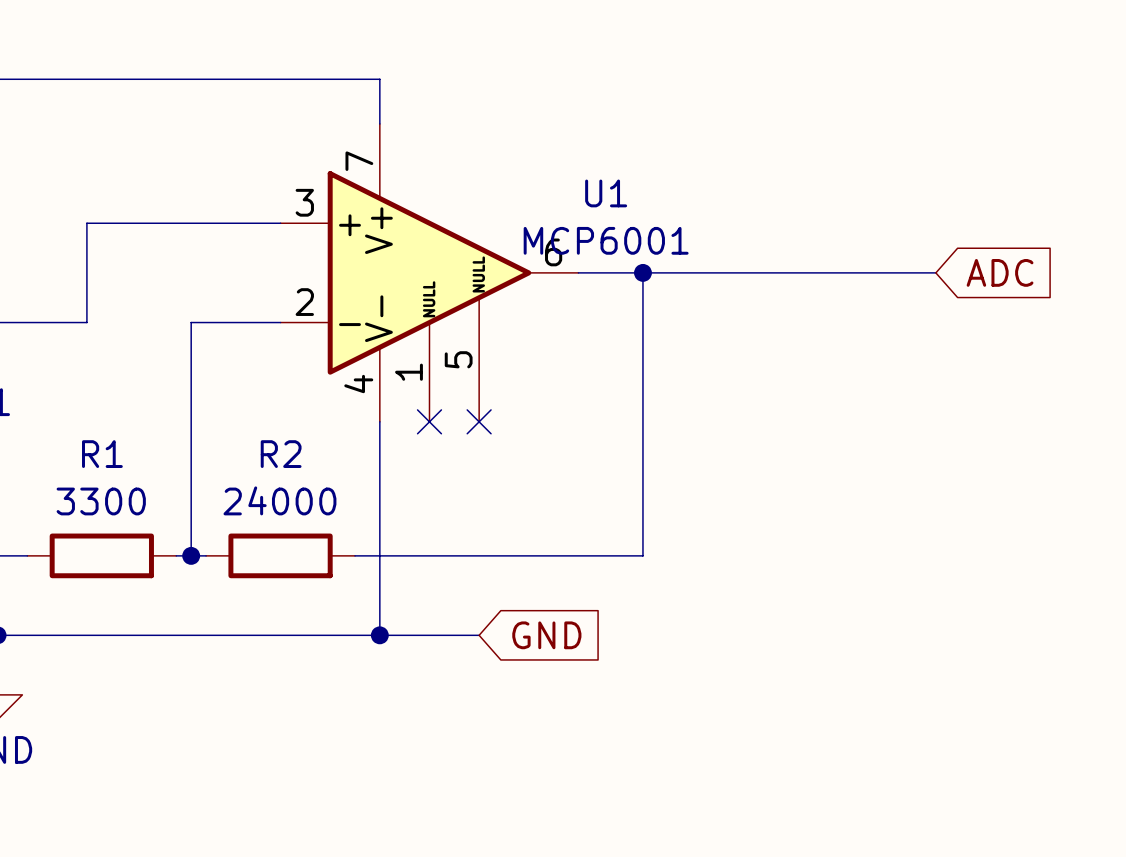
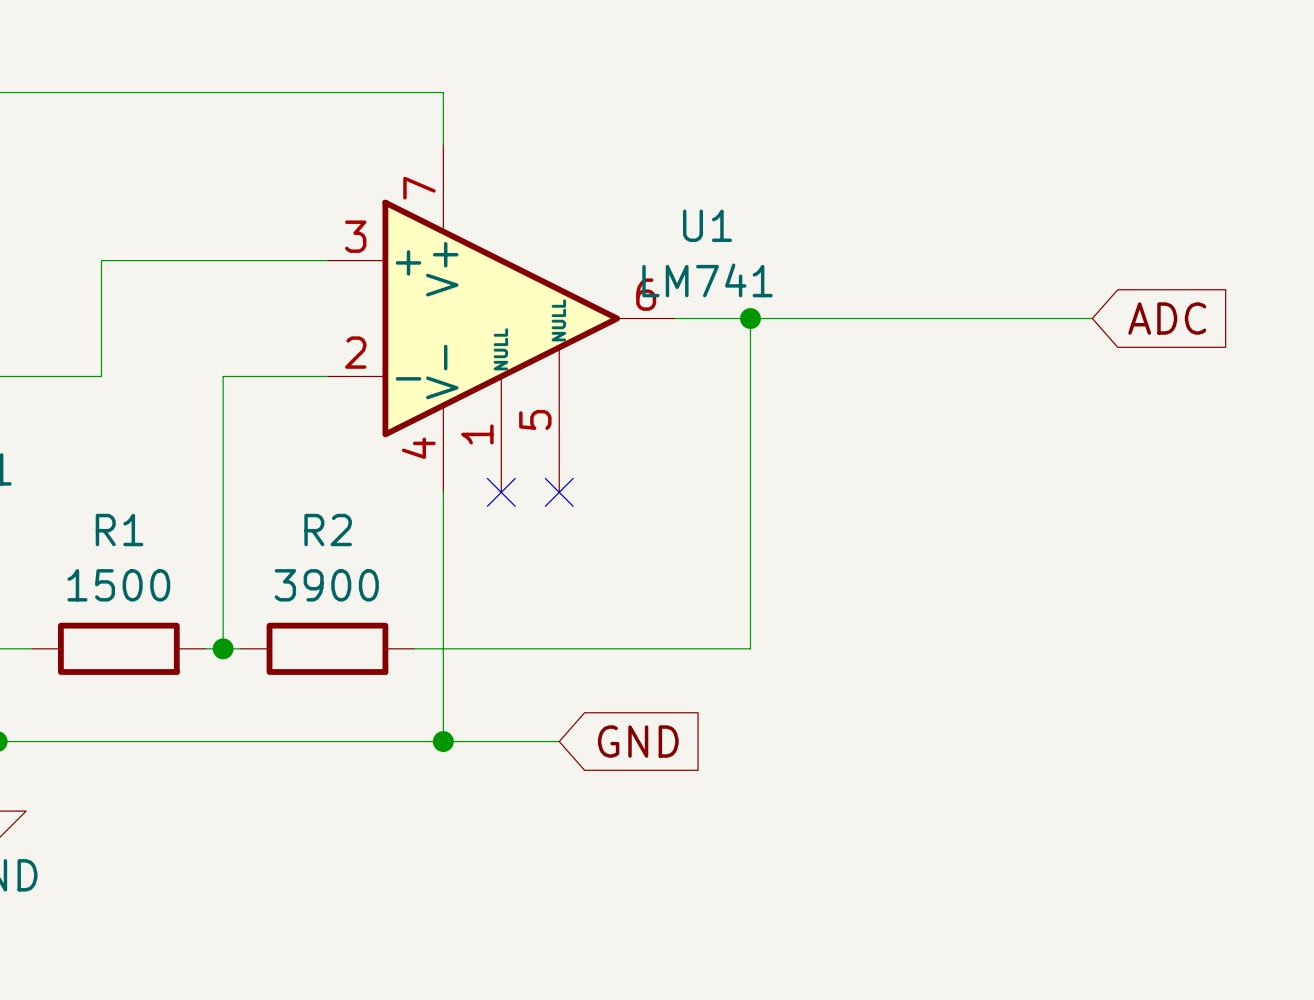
U1 value: MCP6001 (606, 240) -> LM741 (707, 280)
R2 value: 24000 (279, 500) -> 3900 (326, 585)
R1 value: 3300 (101, 501) -> 1500 (118, 585)

